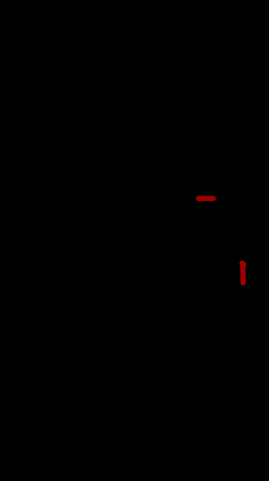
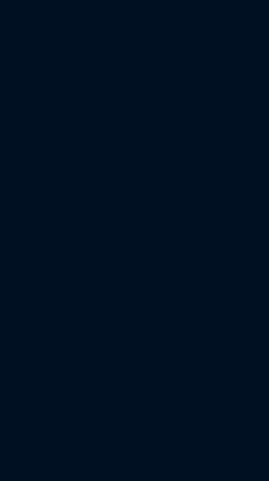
top track: (213, 198) (198, 198) -> none
top track: (241, 262) (242, 282) -> none

